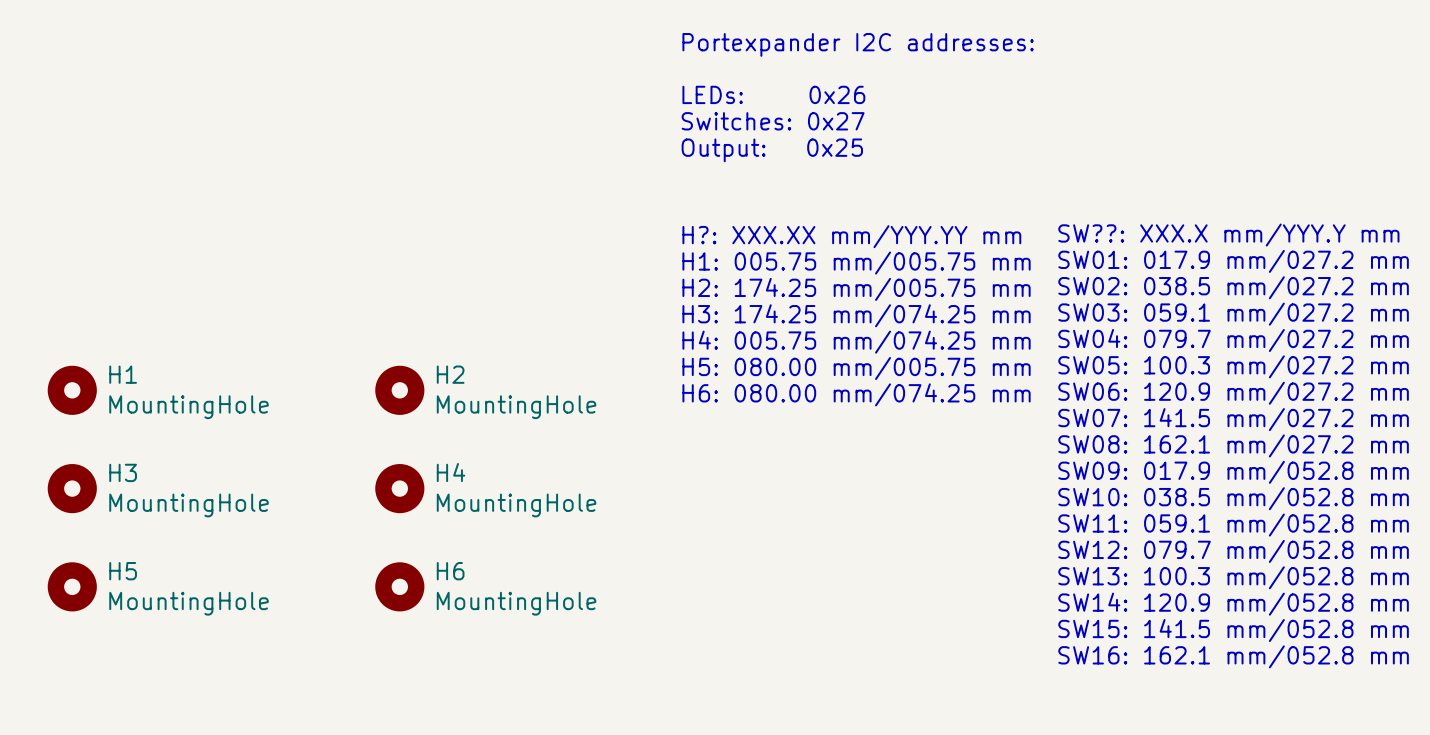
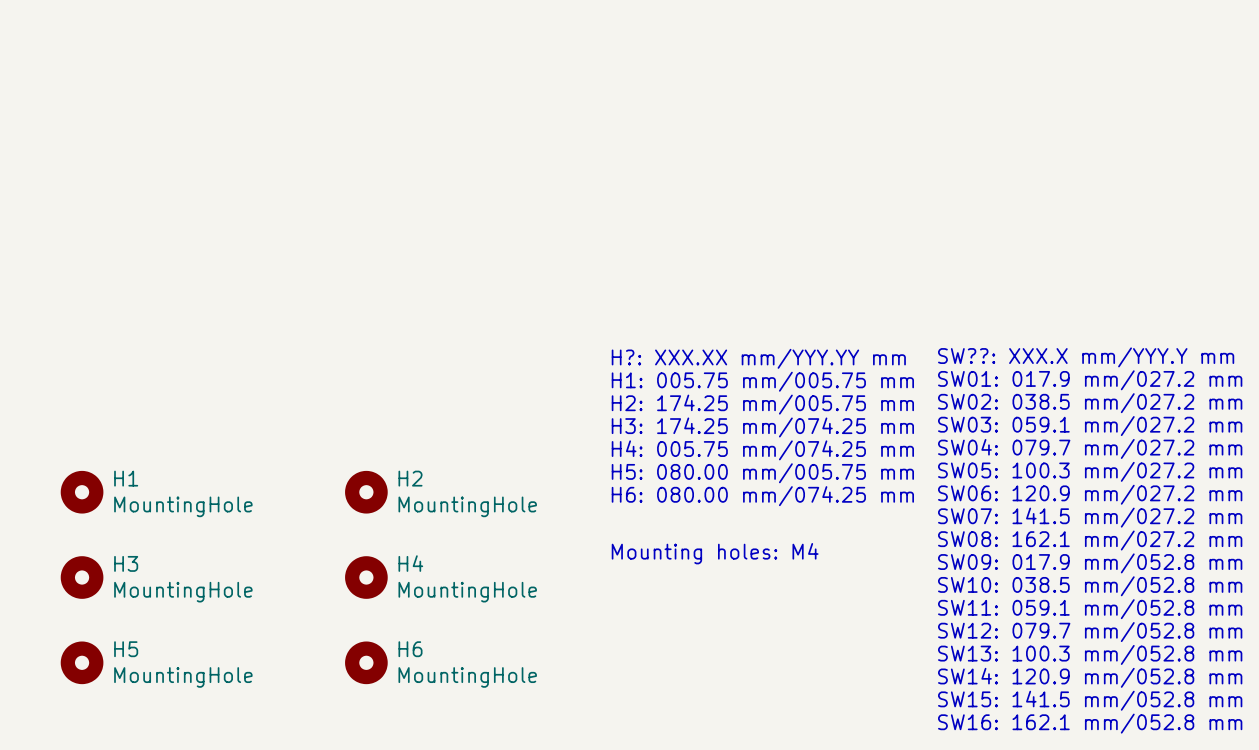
text: Portexpander I2C addresses: (858, 44) -> none
text: LEDs: 0x26 (773, 94) -> none
text: Switches: 0x27 (773, 121) -> none
text: Output: 0x25 (772, 150) -> none
text: none -> Mounting holes: M4 (715, 553)

